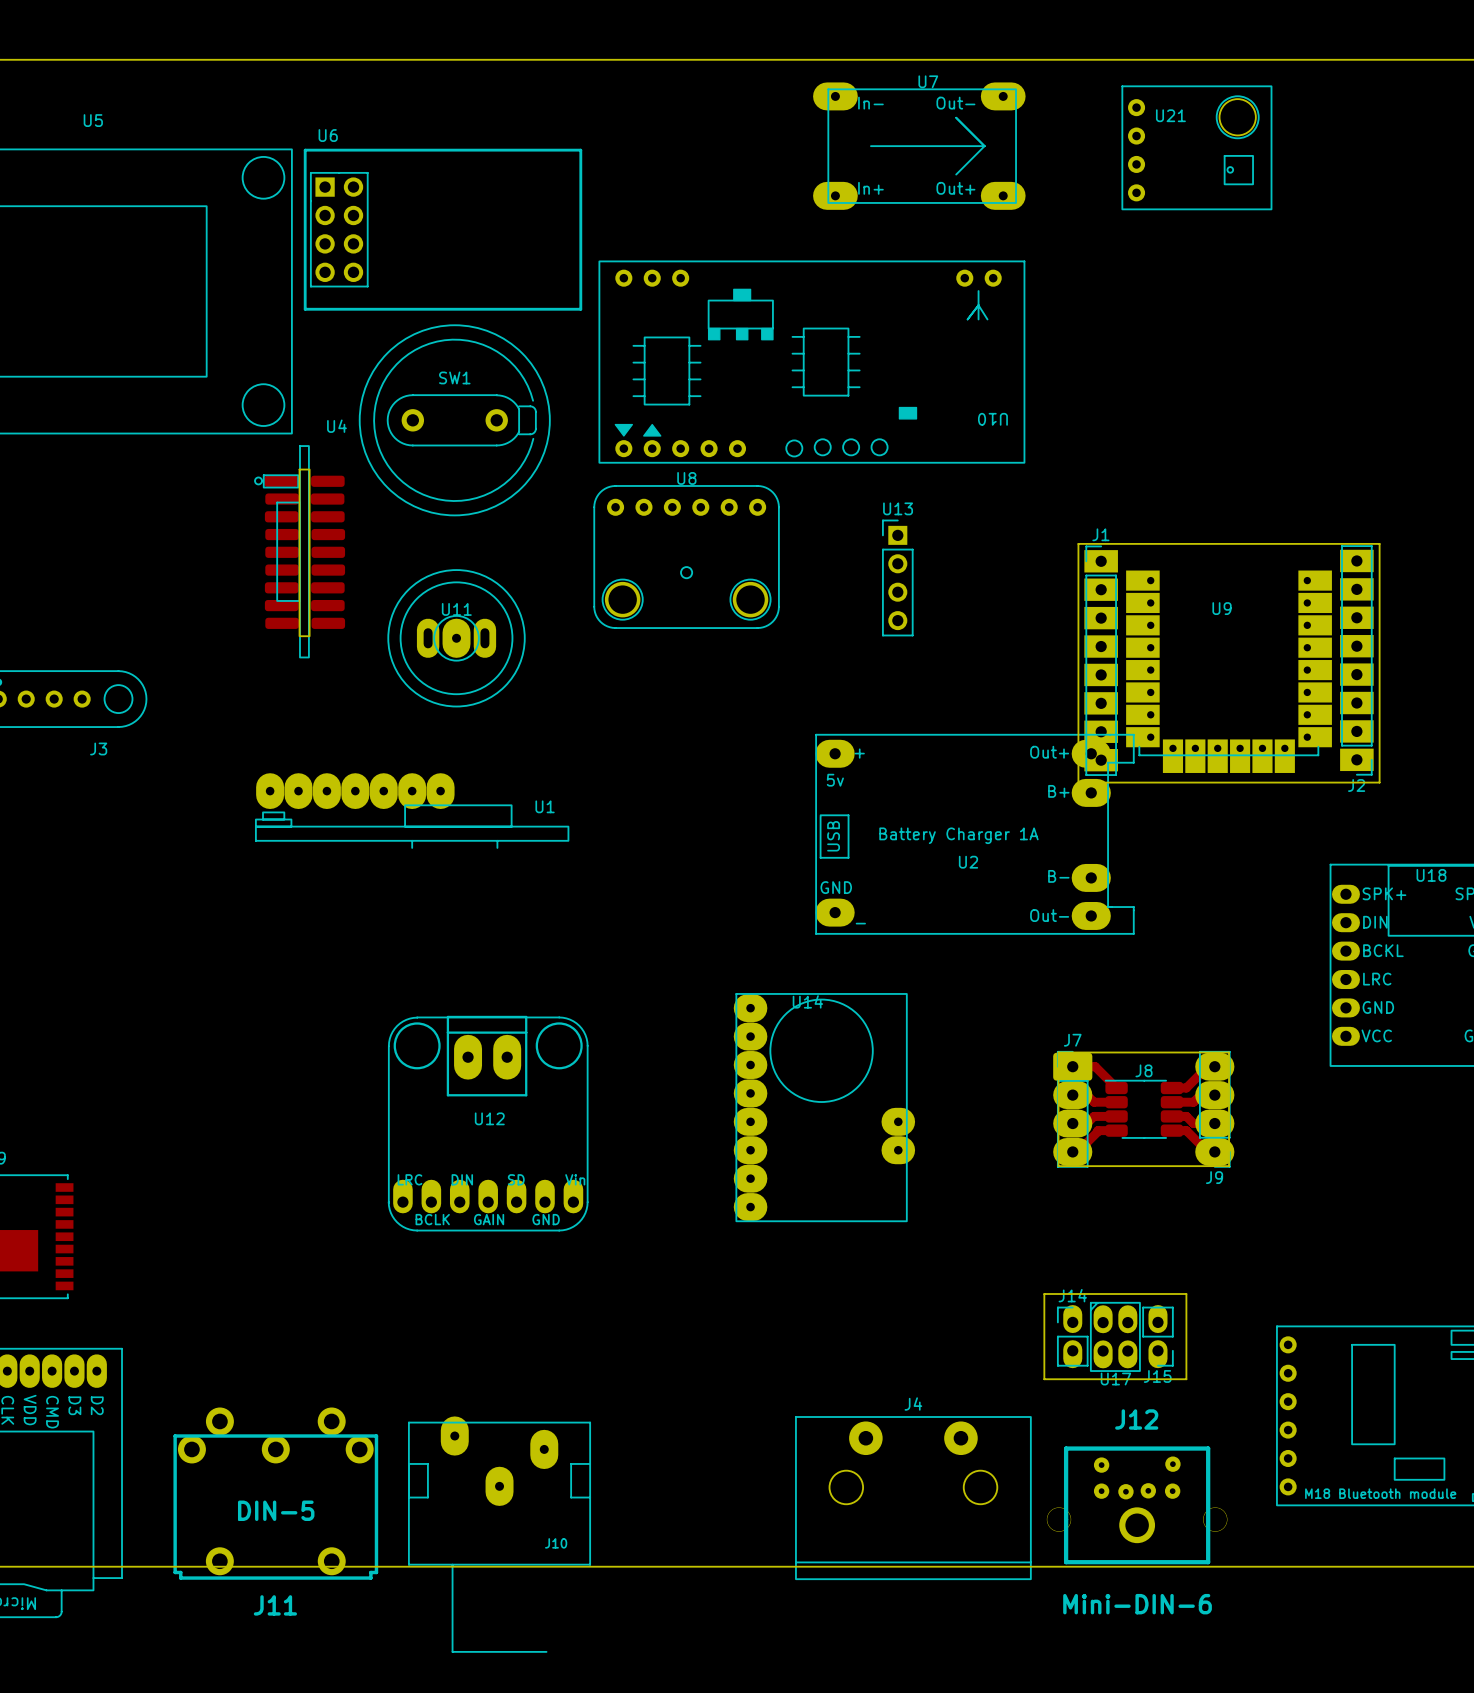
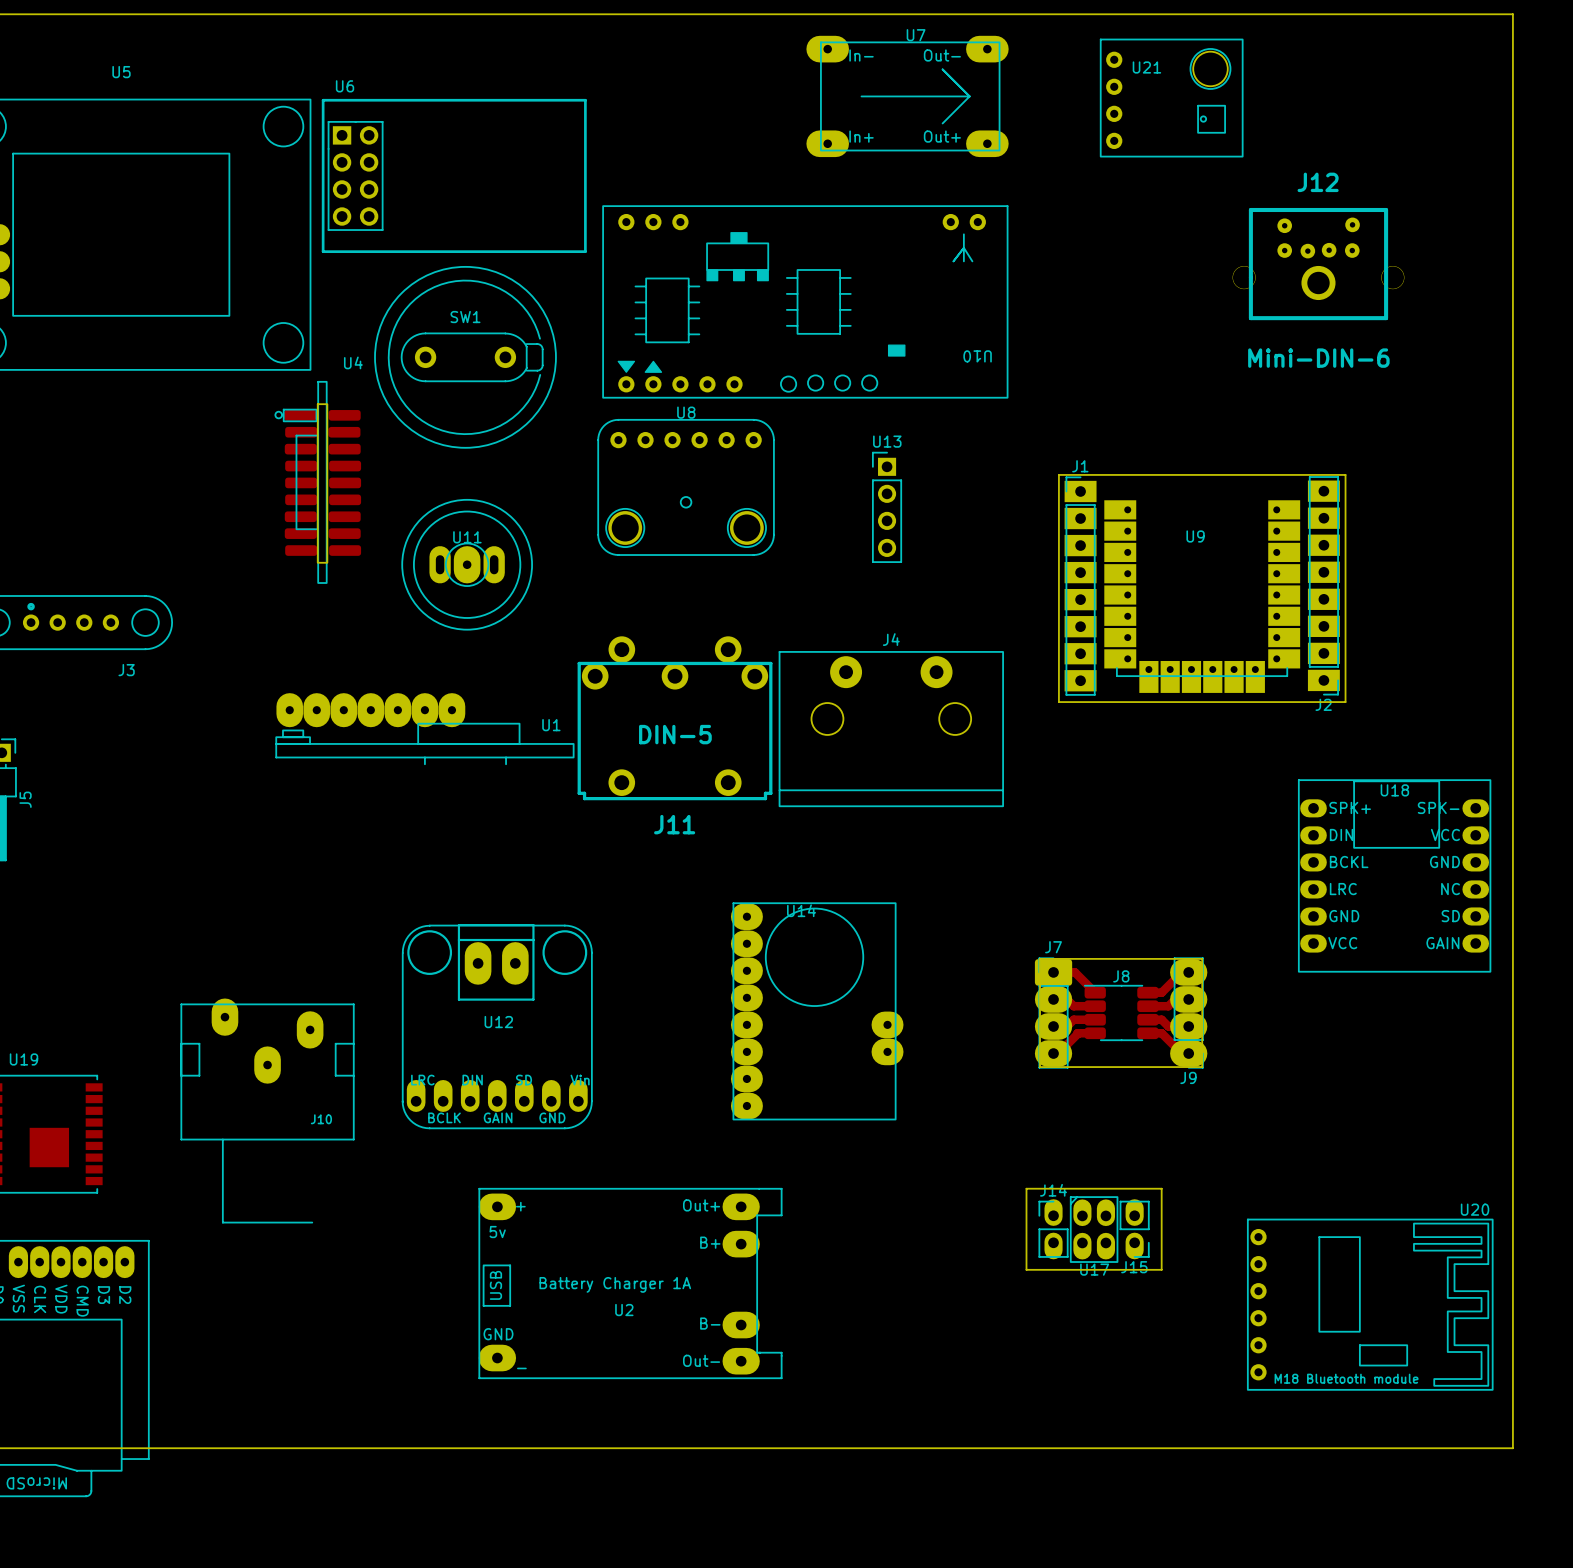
U2 position: (974, 834) -> (630, 1283)
J11 position: (275, 1493) -> (675, 718)
J4 position: (913, 1498) -> (891, 729)
J12 position: (1137, 1505) -> (1318, 264)
J10 position: (500, 1534) -> (268, 1110)

